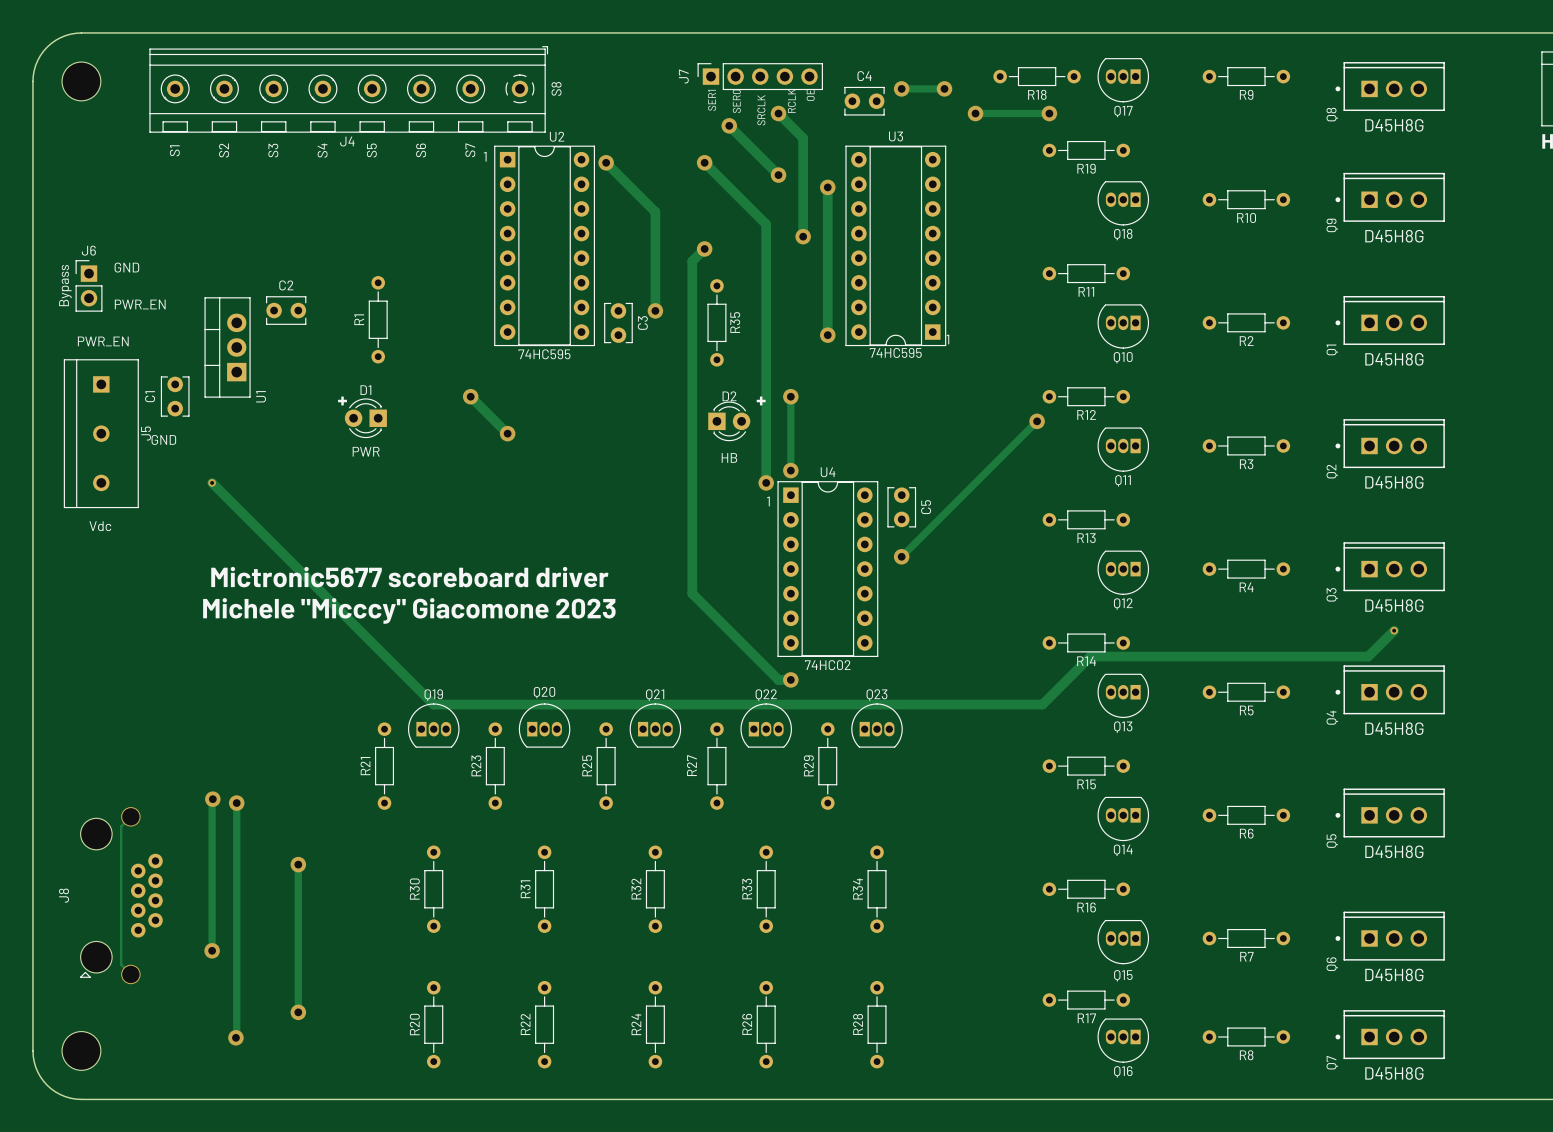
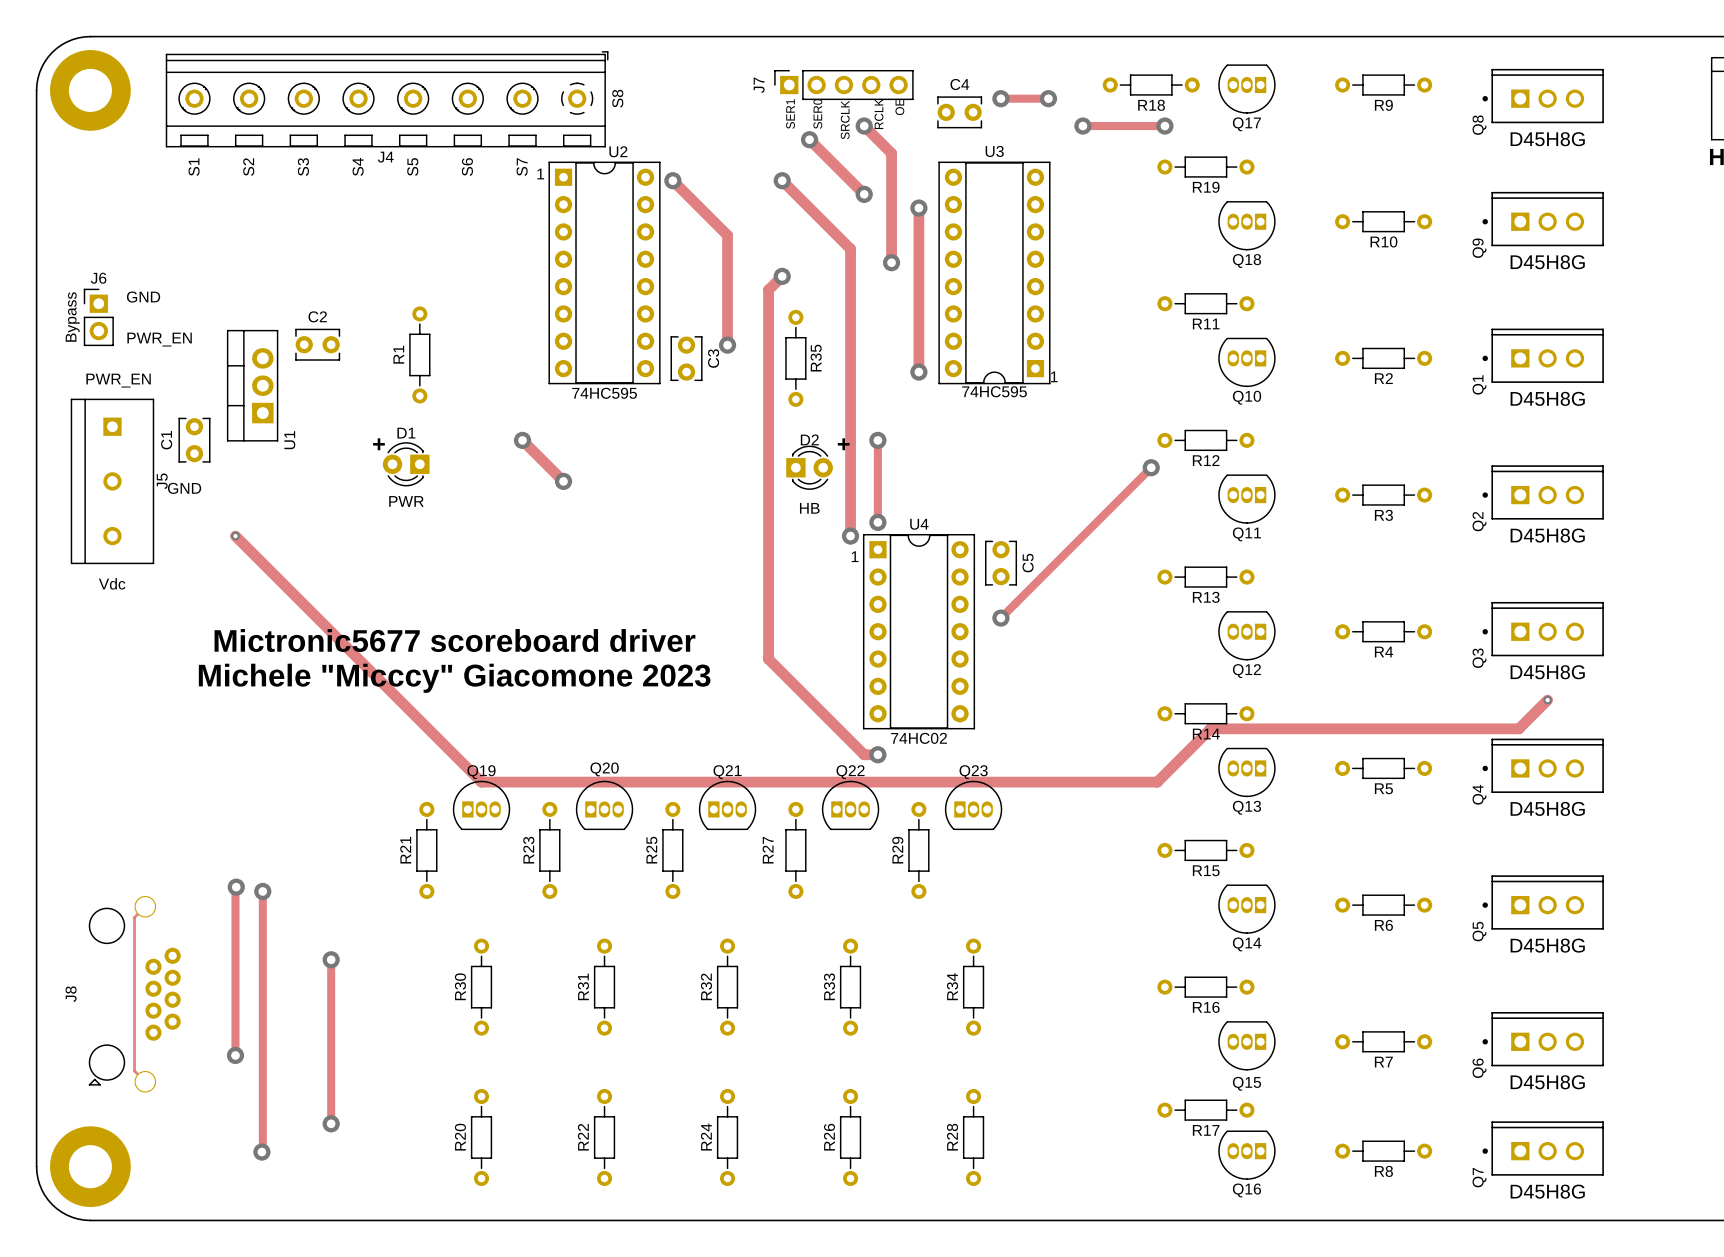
part footprint: [62, 62, 101, 101] -> [50, 50, 131, 131]
part footprint: [62, 1031, 101, 1071] -> [50, 1126, 131, 1208]

